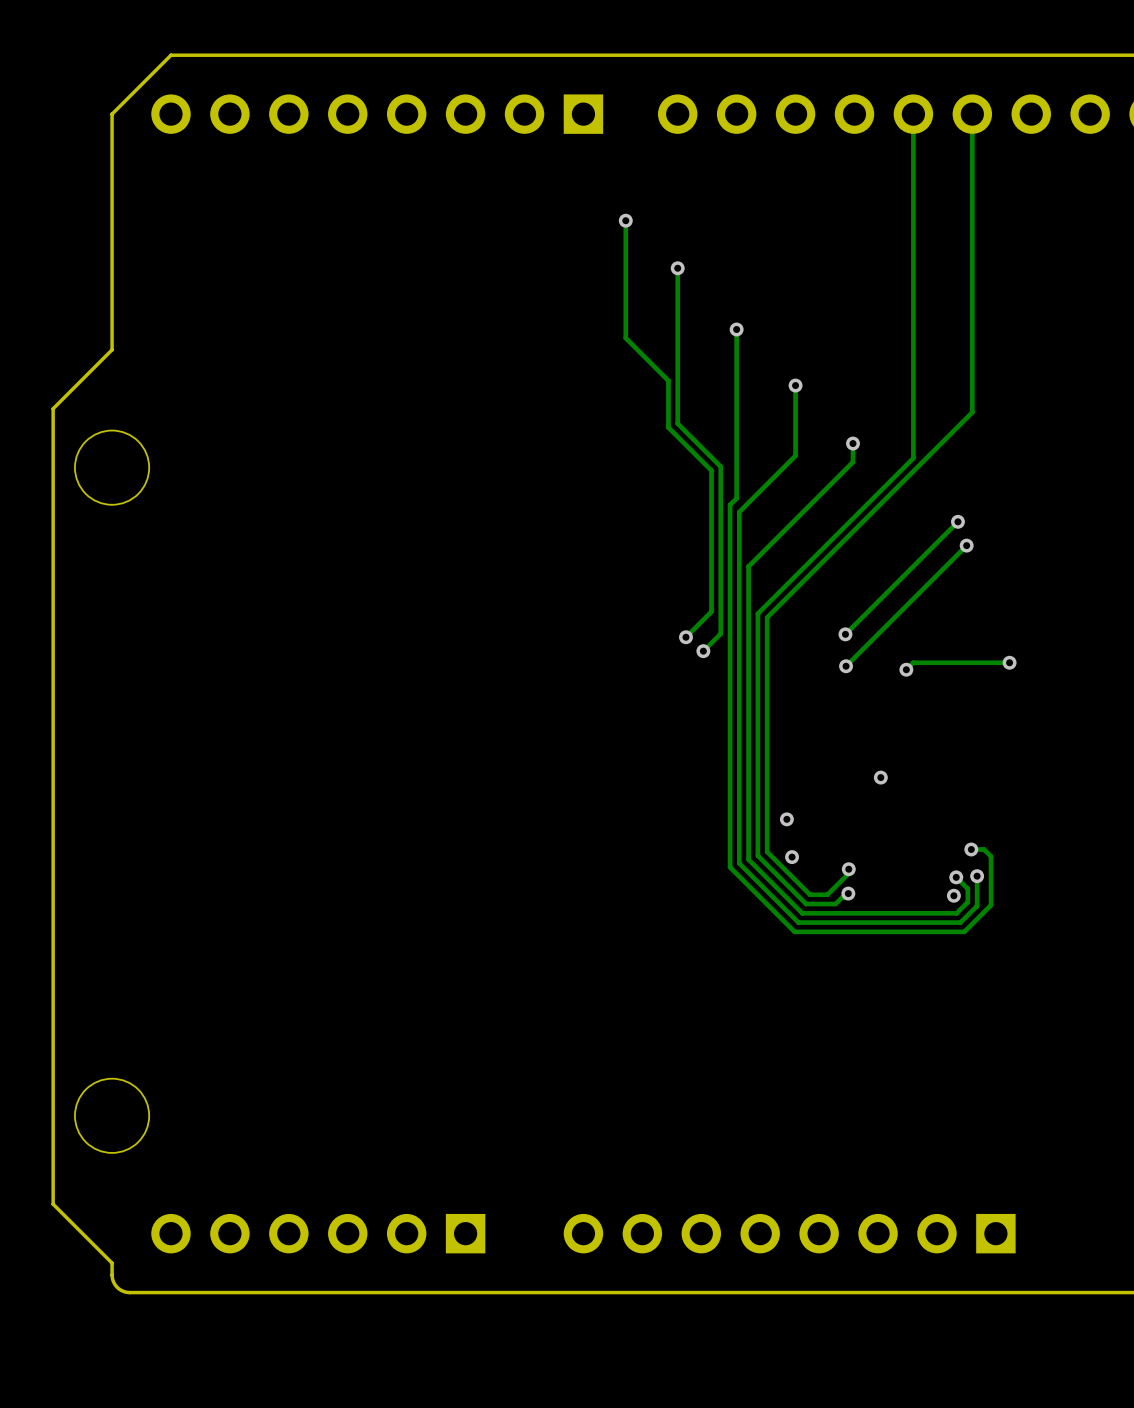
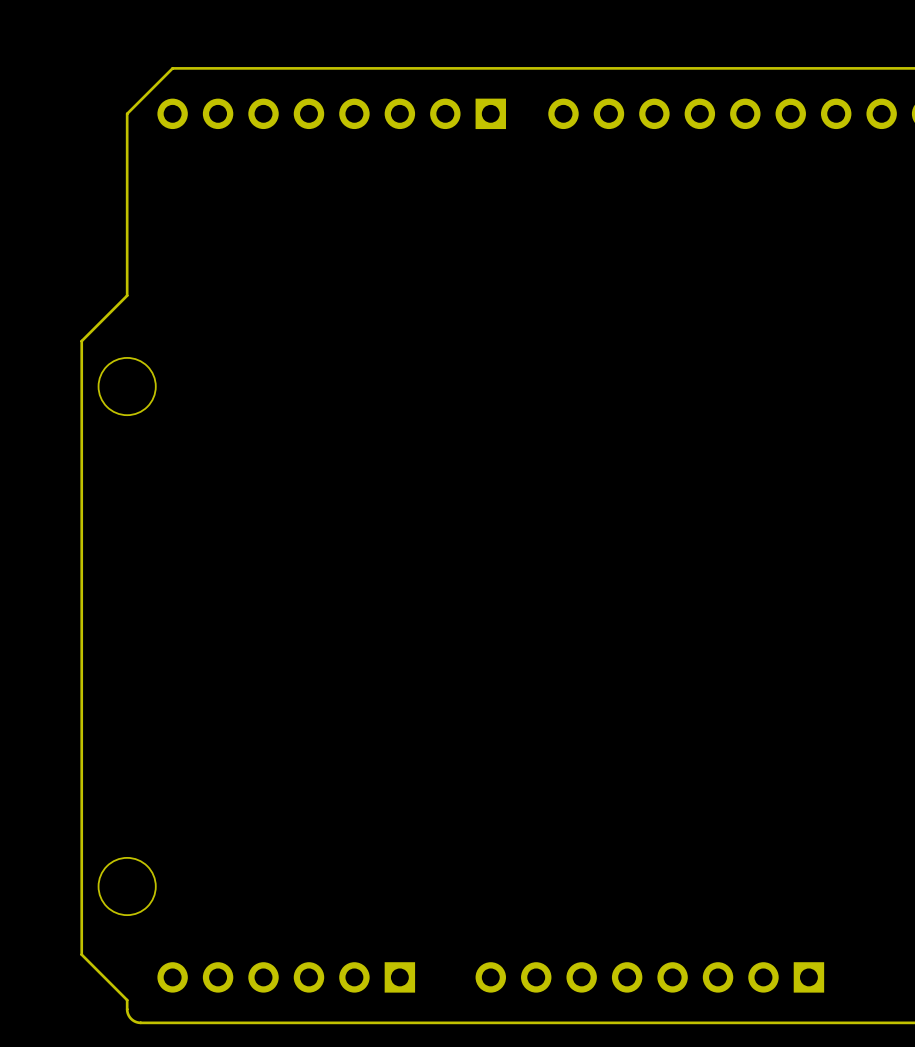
track: (913, 114) (913, 458) (757, 613) (757, 855) (806, 904) (835, 904) (848, 893) -> none
track: (972, 114) (972, 412) (767, 617) (767, 851) (810, 894) (827, 894) (848, 873) (848, 869) -> none
track: (625, 220) (625, 338) (668, 380) (668, 427) (711, 470) (711, 611) (685, 637) -> none
via: (625, 220) -> none
track: (677, 268) (677, 423) (720, 466) (720, 633) (703, 651) -> none
via: (677, 268) -> none
track: (736, 329) (736, 498) (730, 505) (730, 867) (794, 931) (964, 931) (991, 905) (991, 856) (984, 849) (971, 849) -> none
via: (736, 329) -> none
track: (795, 385) (795, 455) (739, 511) (739, 863) (798, 922) (960, 922) (977, 905) (977, 876) -> none
via: (795, 385) -> none
track: (853, 443) (853, 462) (748, 566) (748, 859) (802, 913) (956, 913) (967, 902) (967, 888) (956, 877) -> none
via: (853, 443) -> none
track: (957, 521) (845, 634) -> none
via: (957, 521) -> none
track: (966, 545) (846, 666) -> none
via: (966, 545) -> none
via: (845, 634) -> none
via: (685, 637) -> none
via: (703, 651) -> none
track: (1009, 662) (913, 662) (909, 666) (909, 672) (906, 669) -> none
via: (1009, 662) -> none
via: (846, 666) -> none
via: (906, 669) -> none
via: (880, 777) -> none
via: (786, 819) -> none
via: (971, 849) -> none
via: (792, 857) -> none
via: (848, 869) -> none
via: (977, 876) -> none
via: (956, 877) -> none
via: (848, 893) -> none
via: (953, 895) -> none

